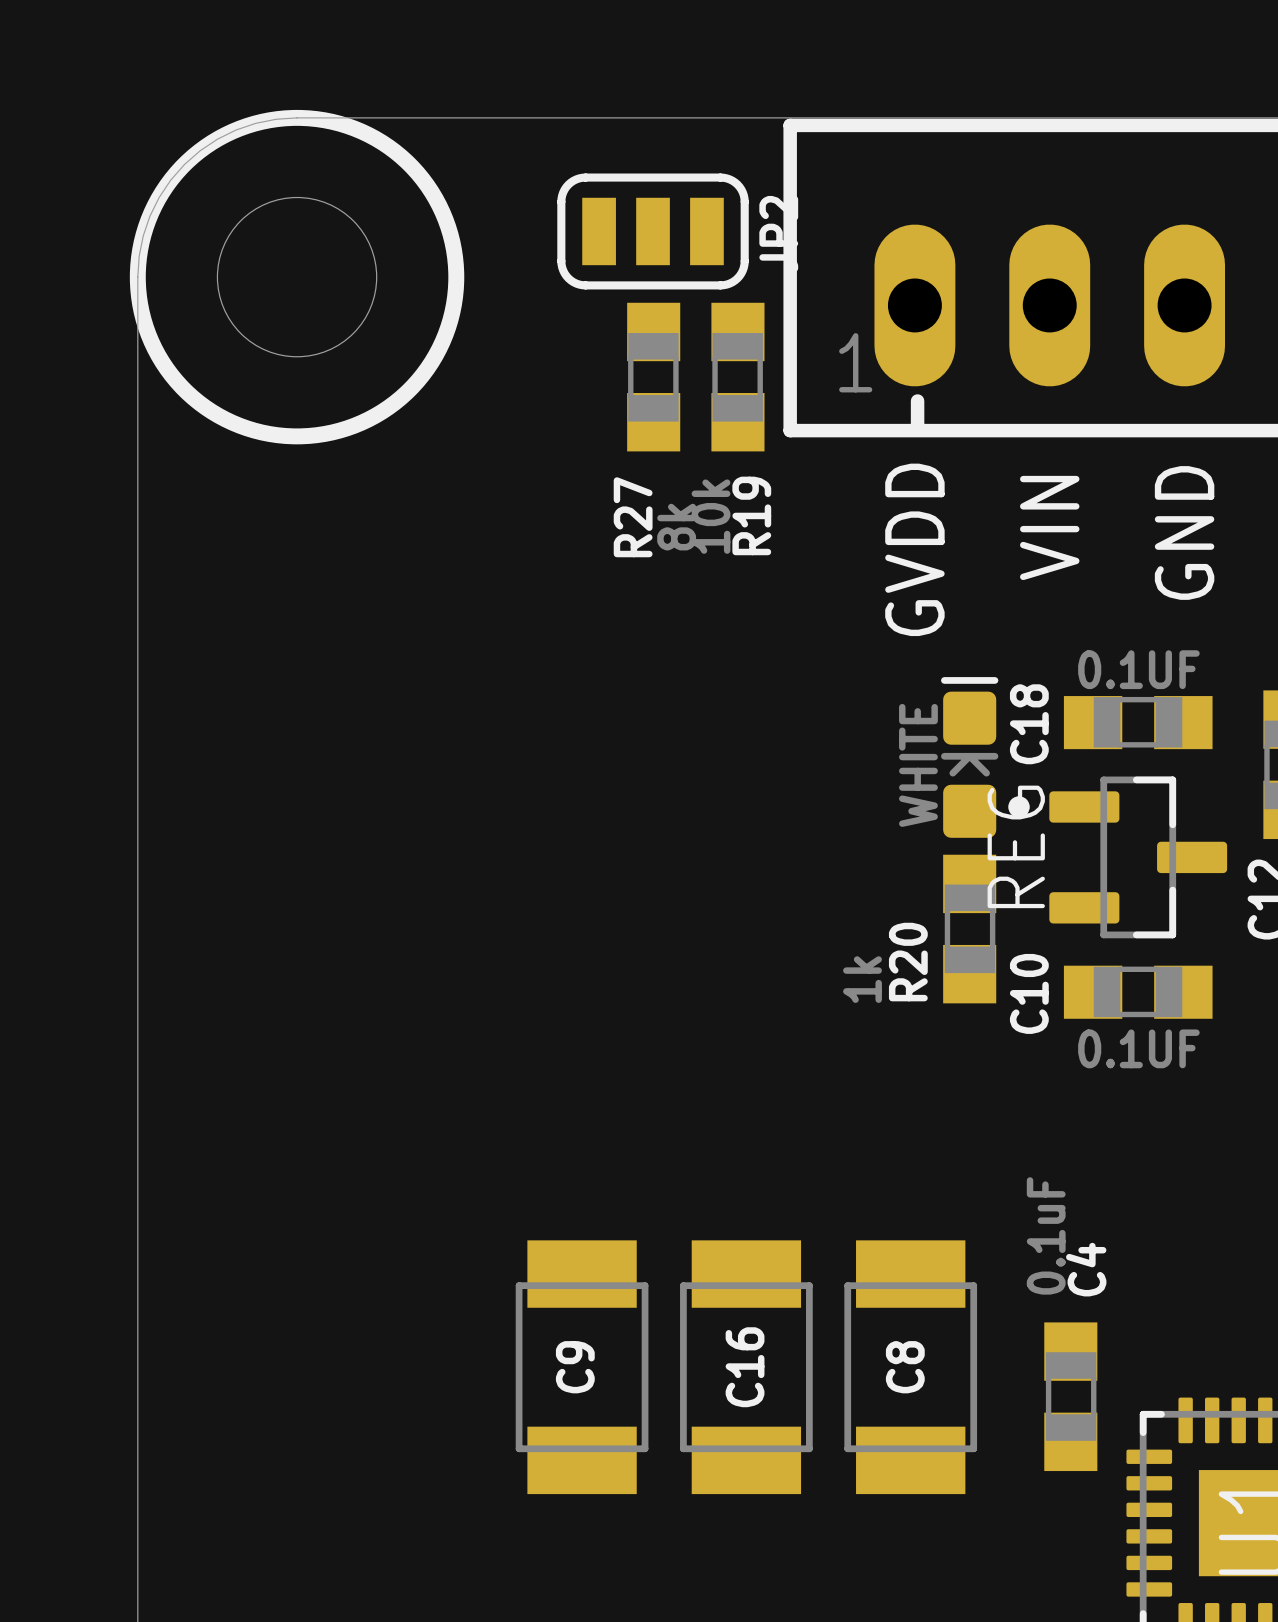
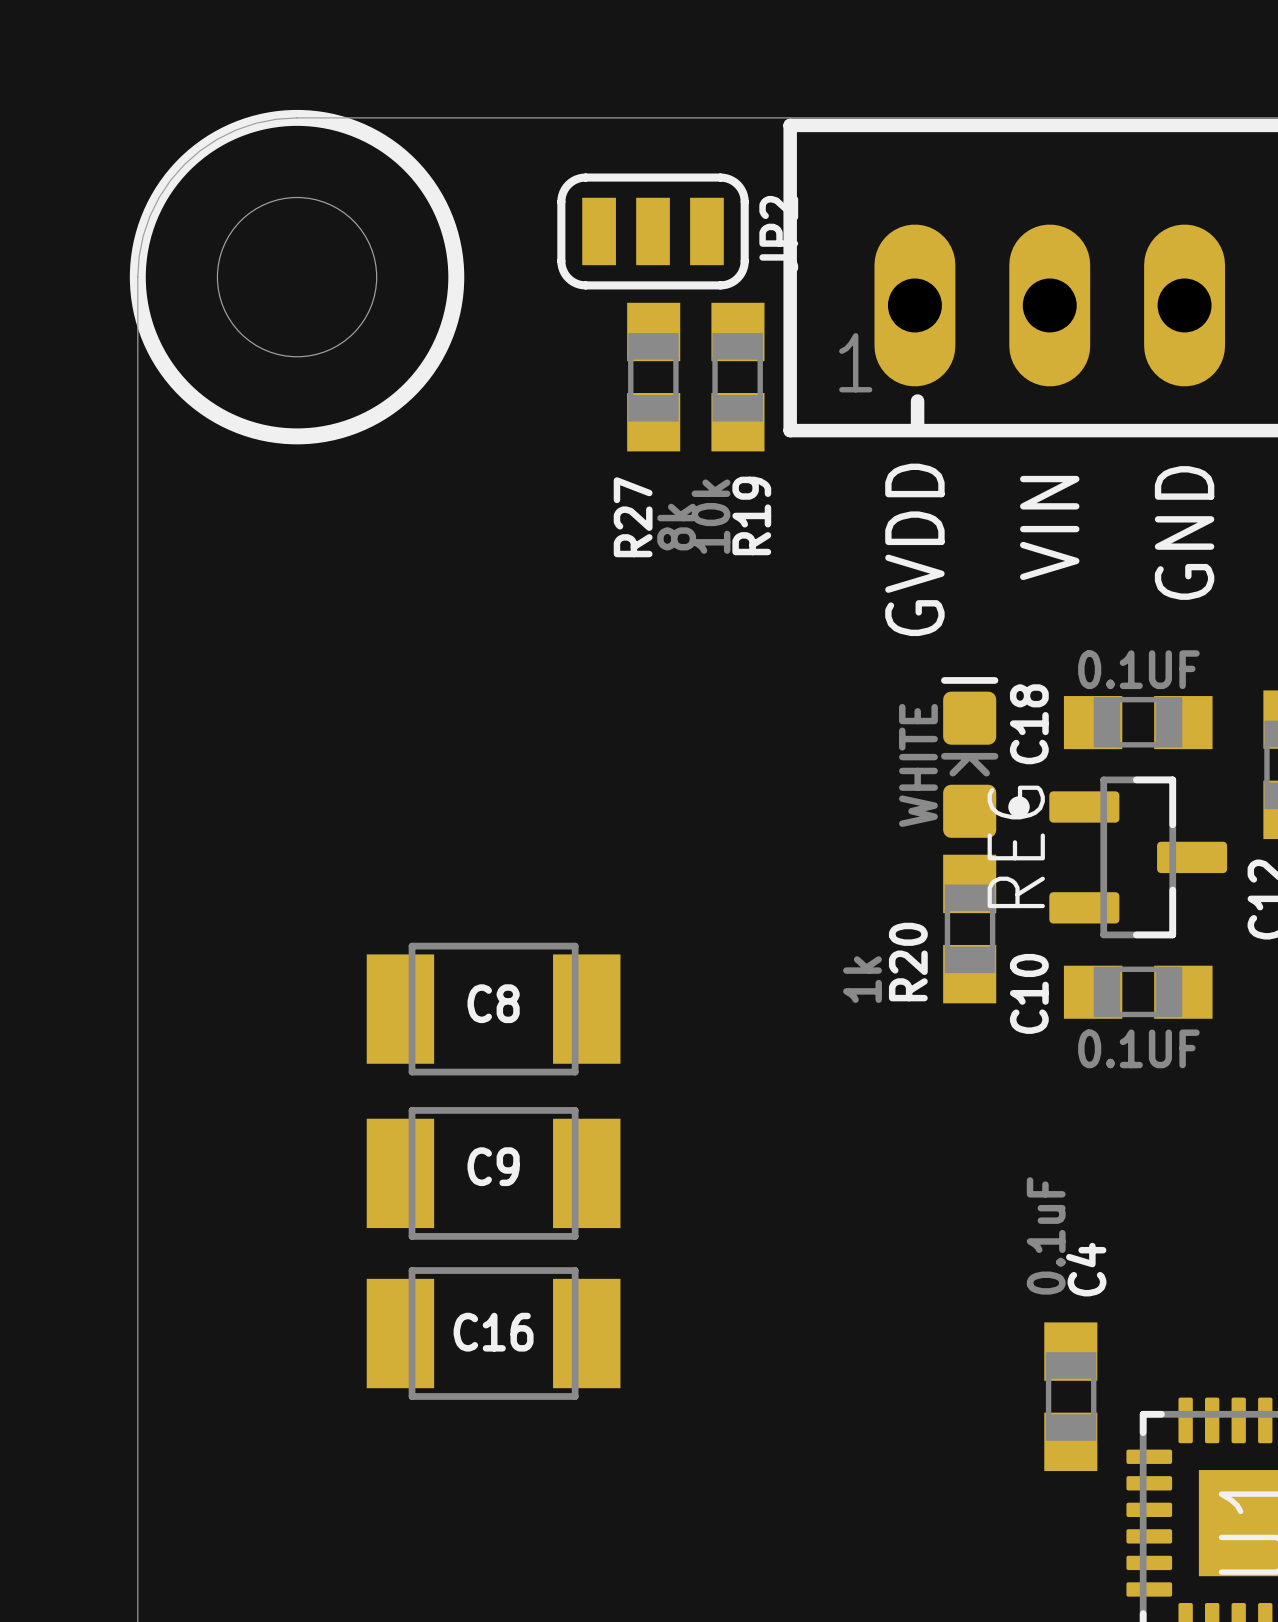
C9 rotation: 0° (582, 1367) -> 90° clockwise (493, 1173)
C9 position: (582, 1367) -> (493, 1173)
C16 rotation: 0° (746, 1367) -> 90° clockwise (493, 1333)
C16 position: (746, 1367) -> (493, 1333)
C8 rotation: 0° (910, 1367) -> 90° clockwise (493, 1009)
C8 position: (910, 1367) -> (493, 1009)

